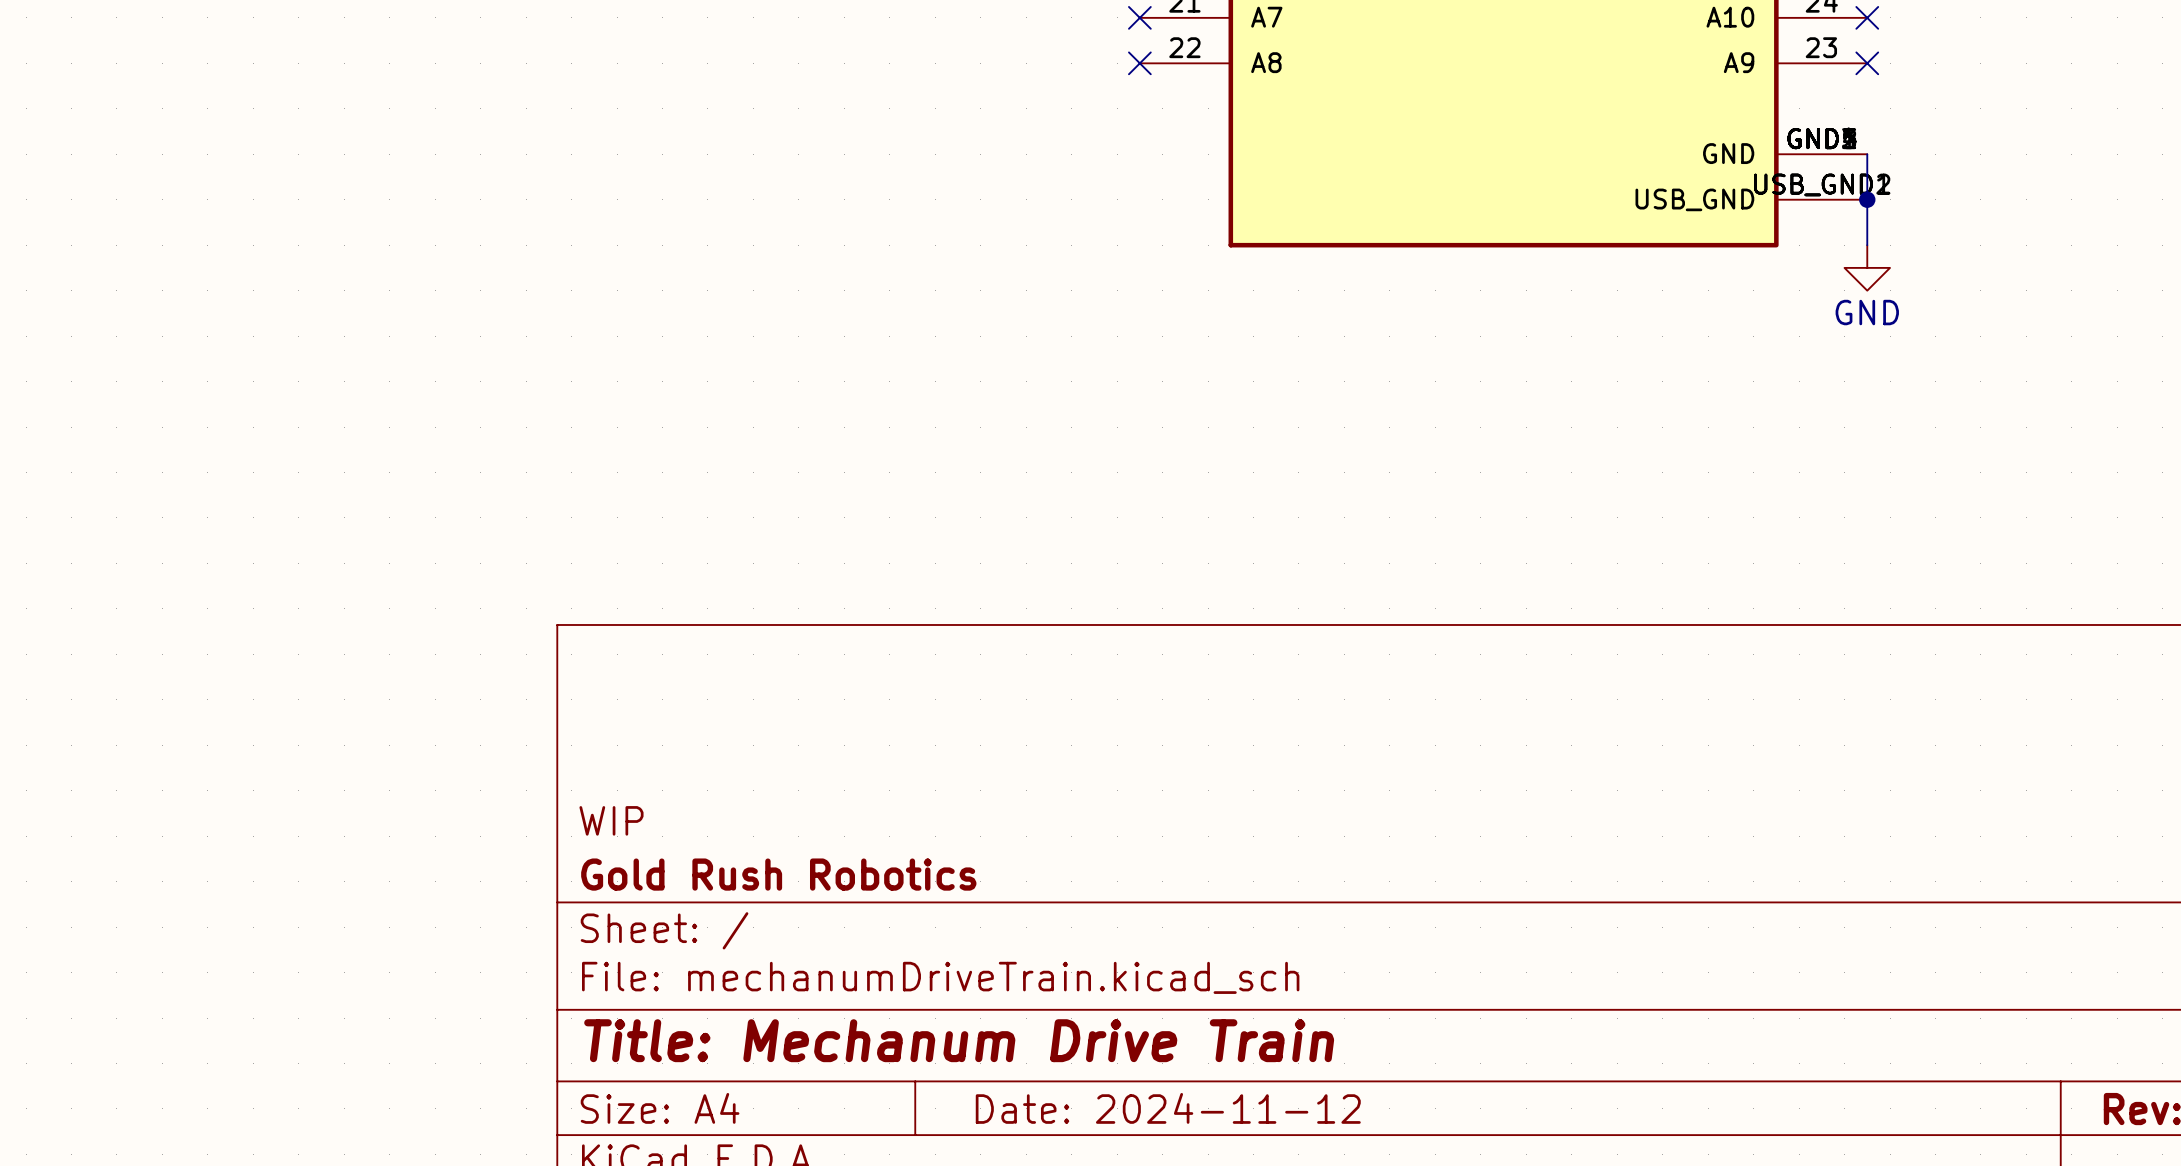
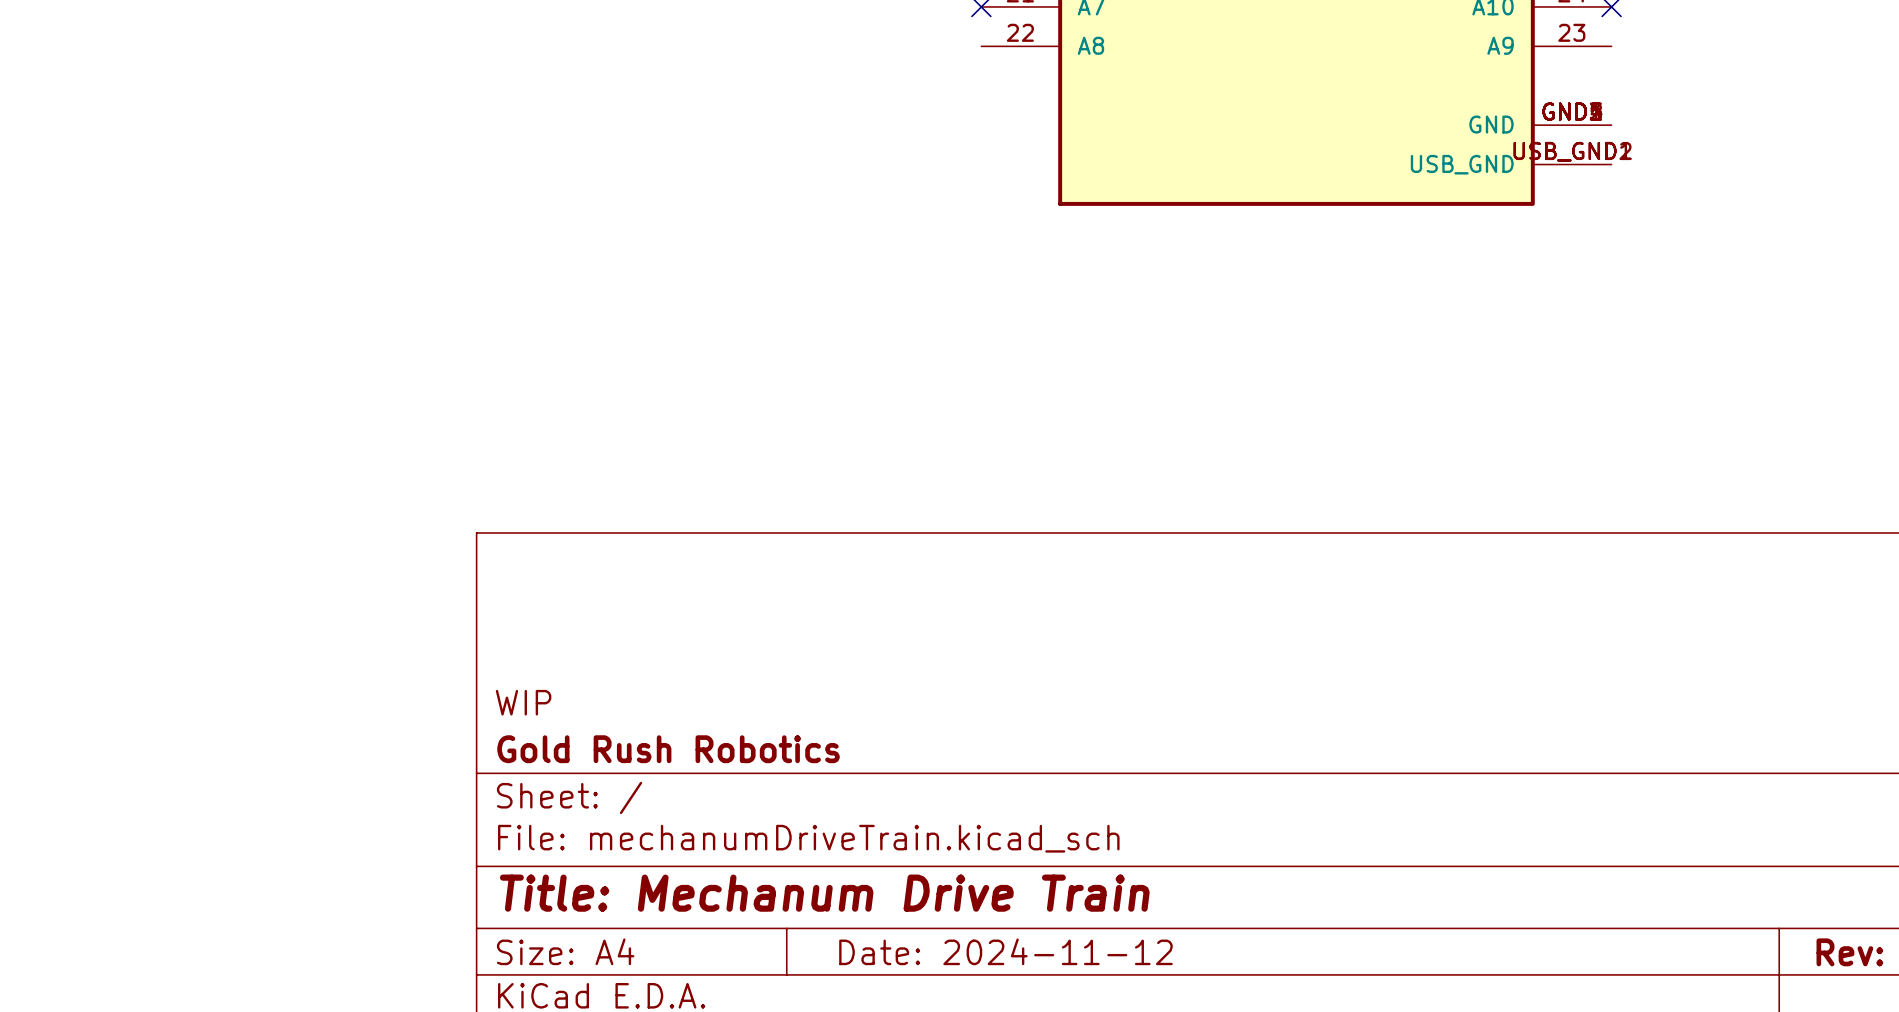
no-connect mark: (1139, 63) -> none
no-connect mark: (1867, 63) -> none
wire: (1867, 154) (1867, 245) -> none
junction: (1867, 199) -> none
power symbol: GND (1867, 267) -> none

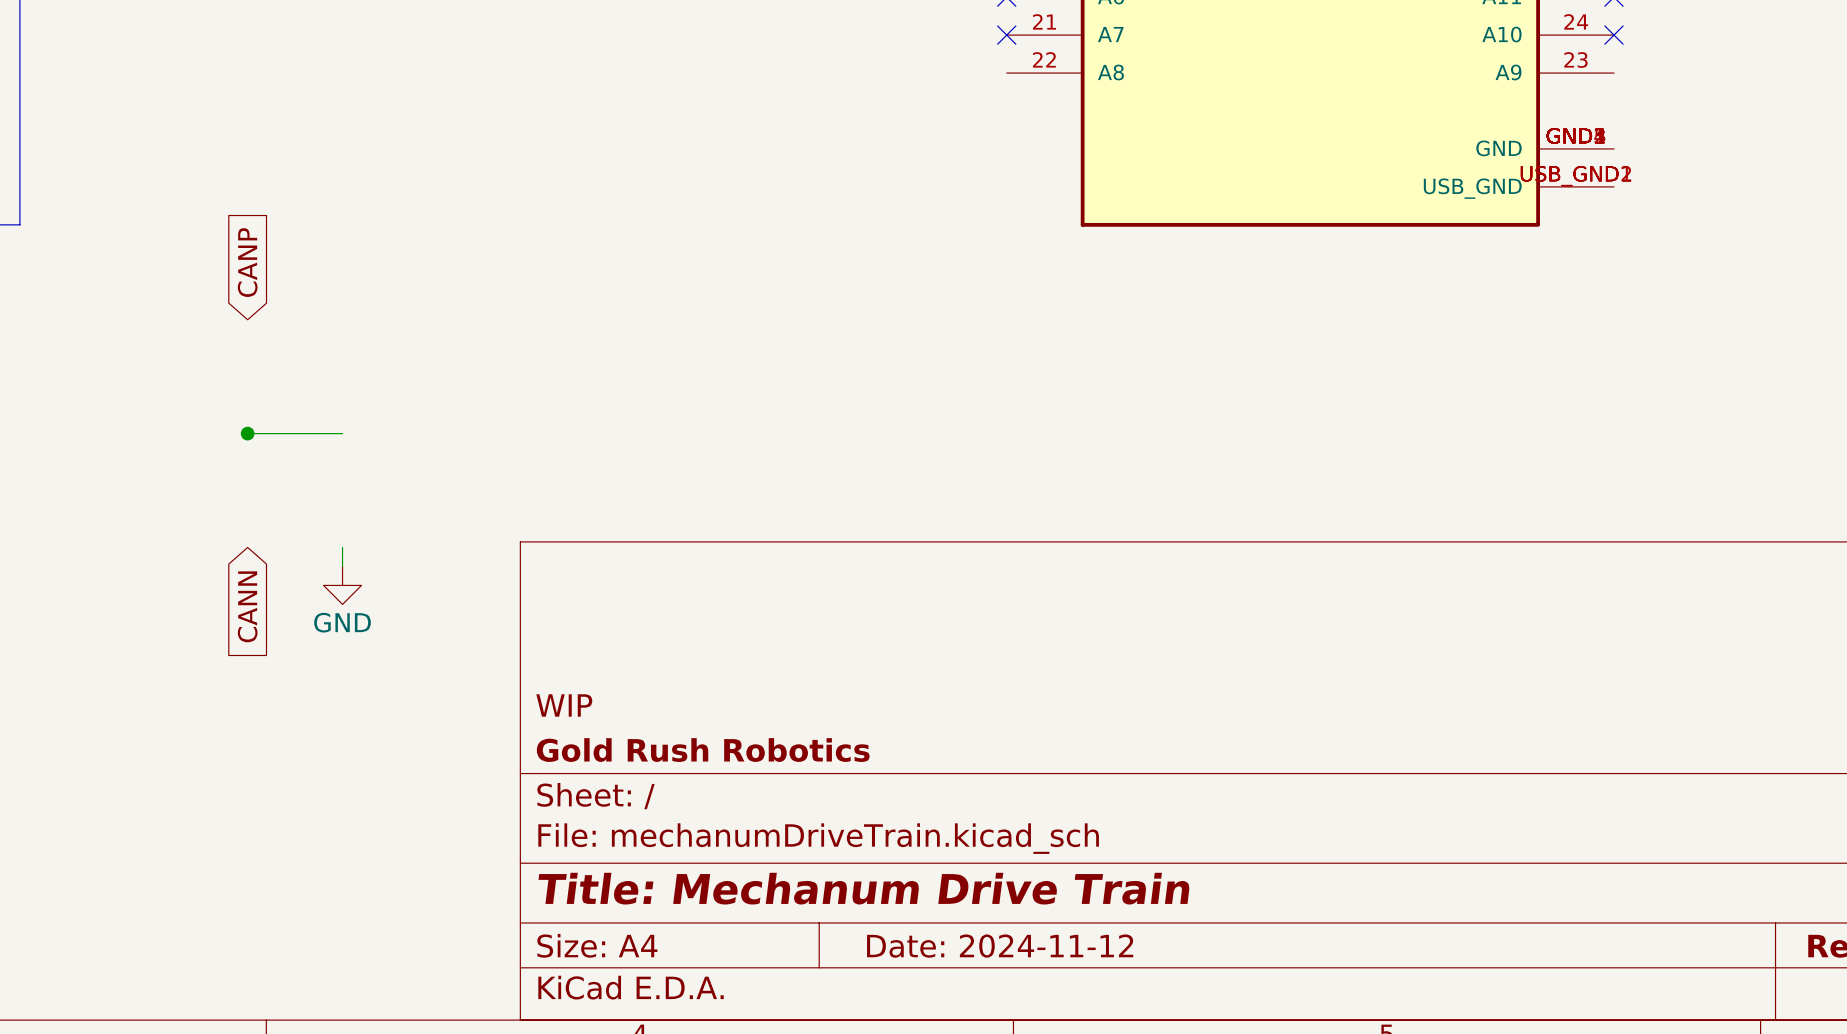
global label: none -> CANP (247, 262)
wire: none -> (247, 433) (342, 433)
junction: none -> (247, 433)
wire: none -> (342, 547) (342, 566)
power symbol: none -> GND (342, 585)
global label: none -> CANN (247, 606)

